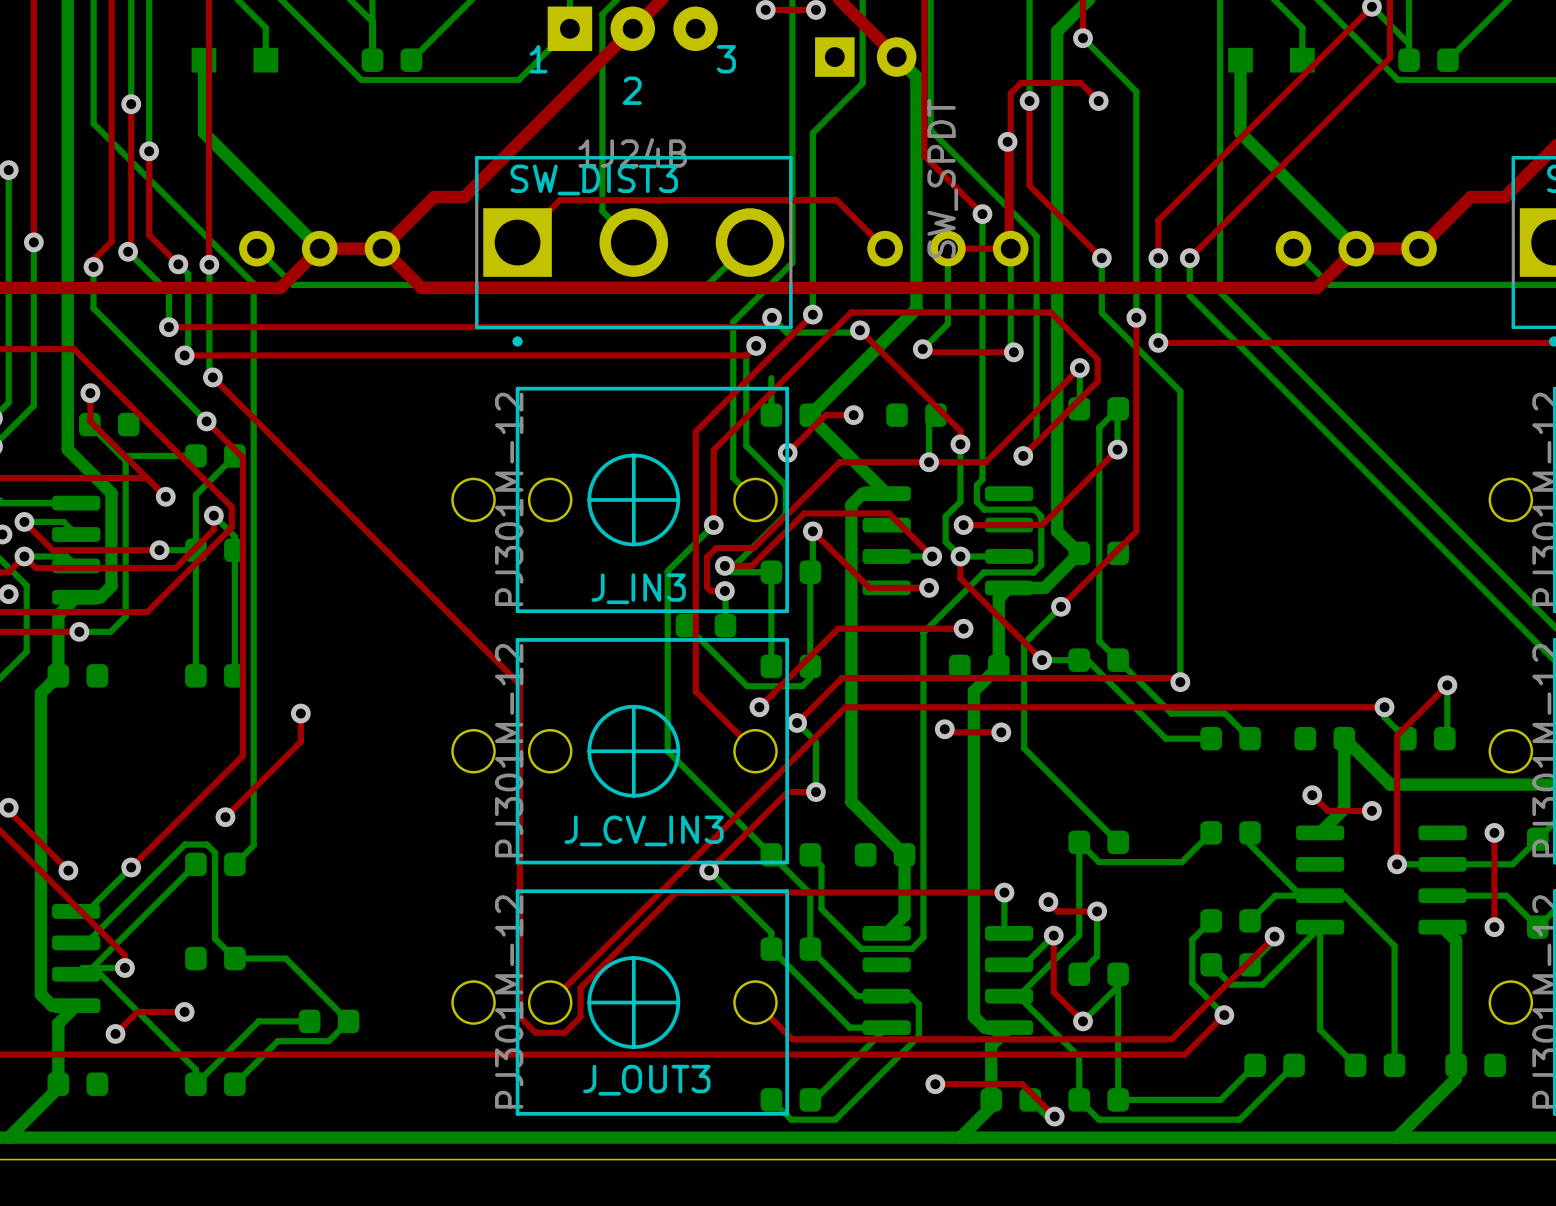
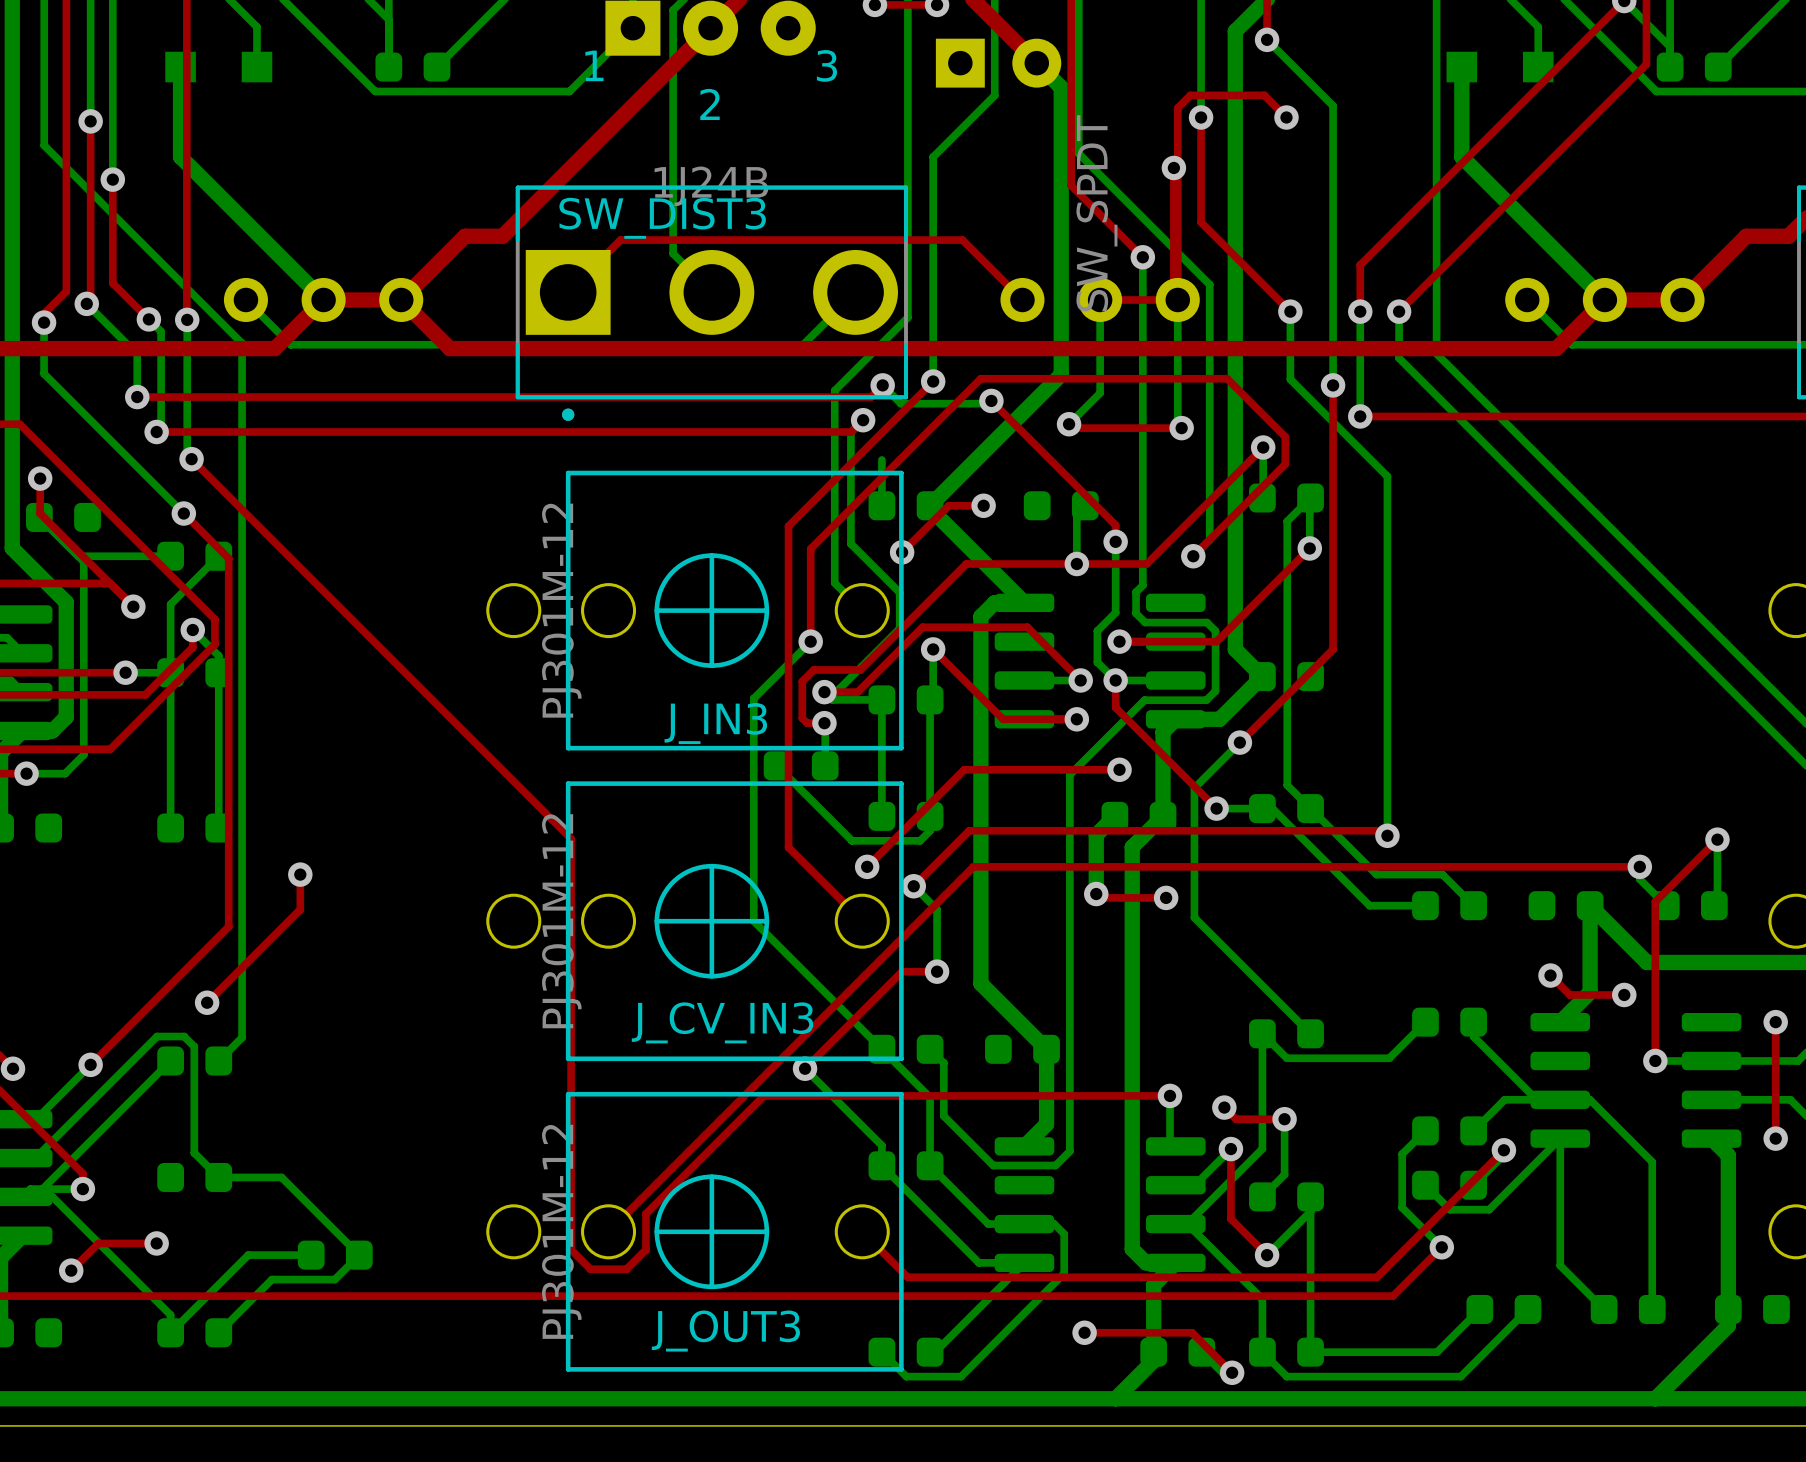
bottom track: none -> (1114, 816) (1096, 835) (1096, 894)

